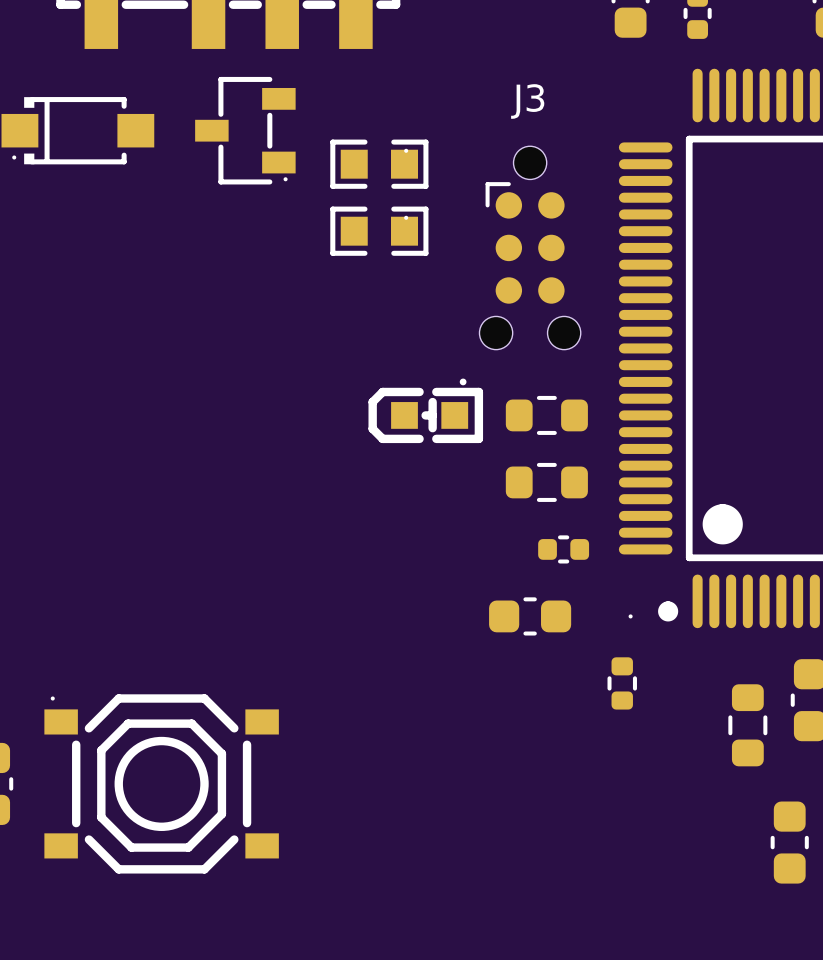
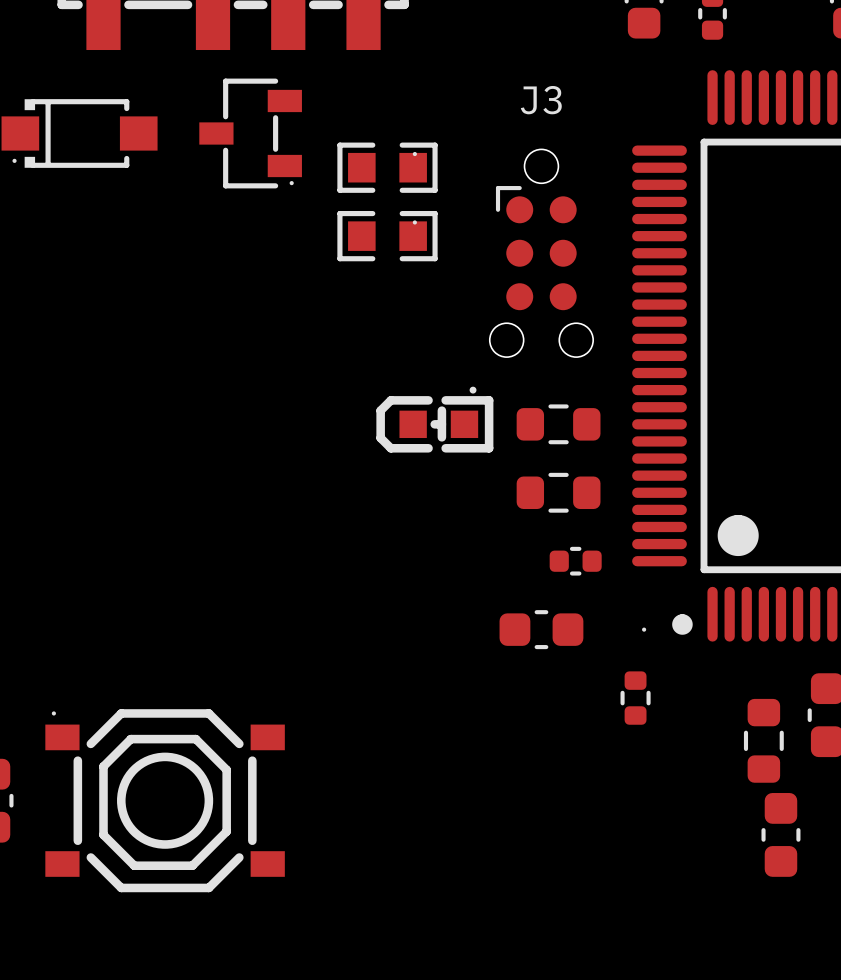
part position: (789, 842) -> (780, 834)

